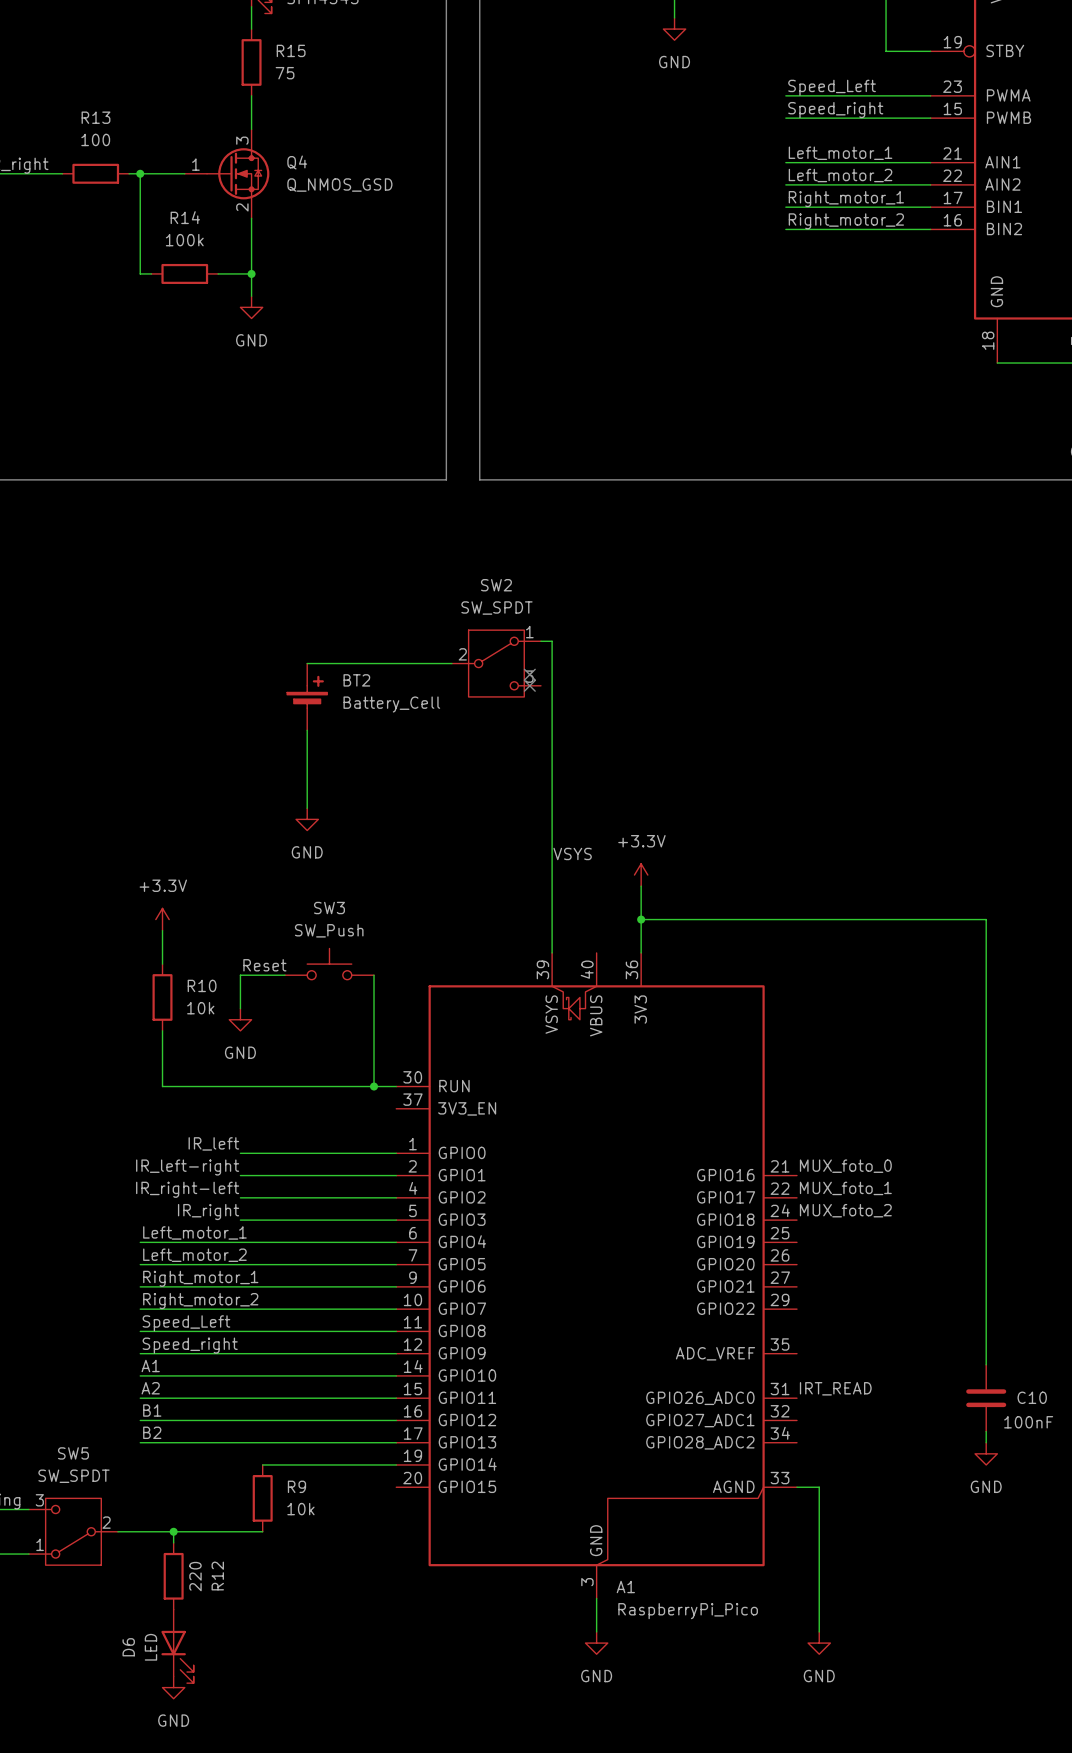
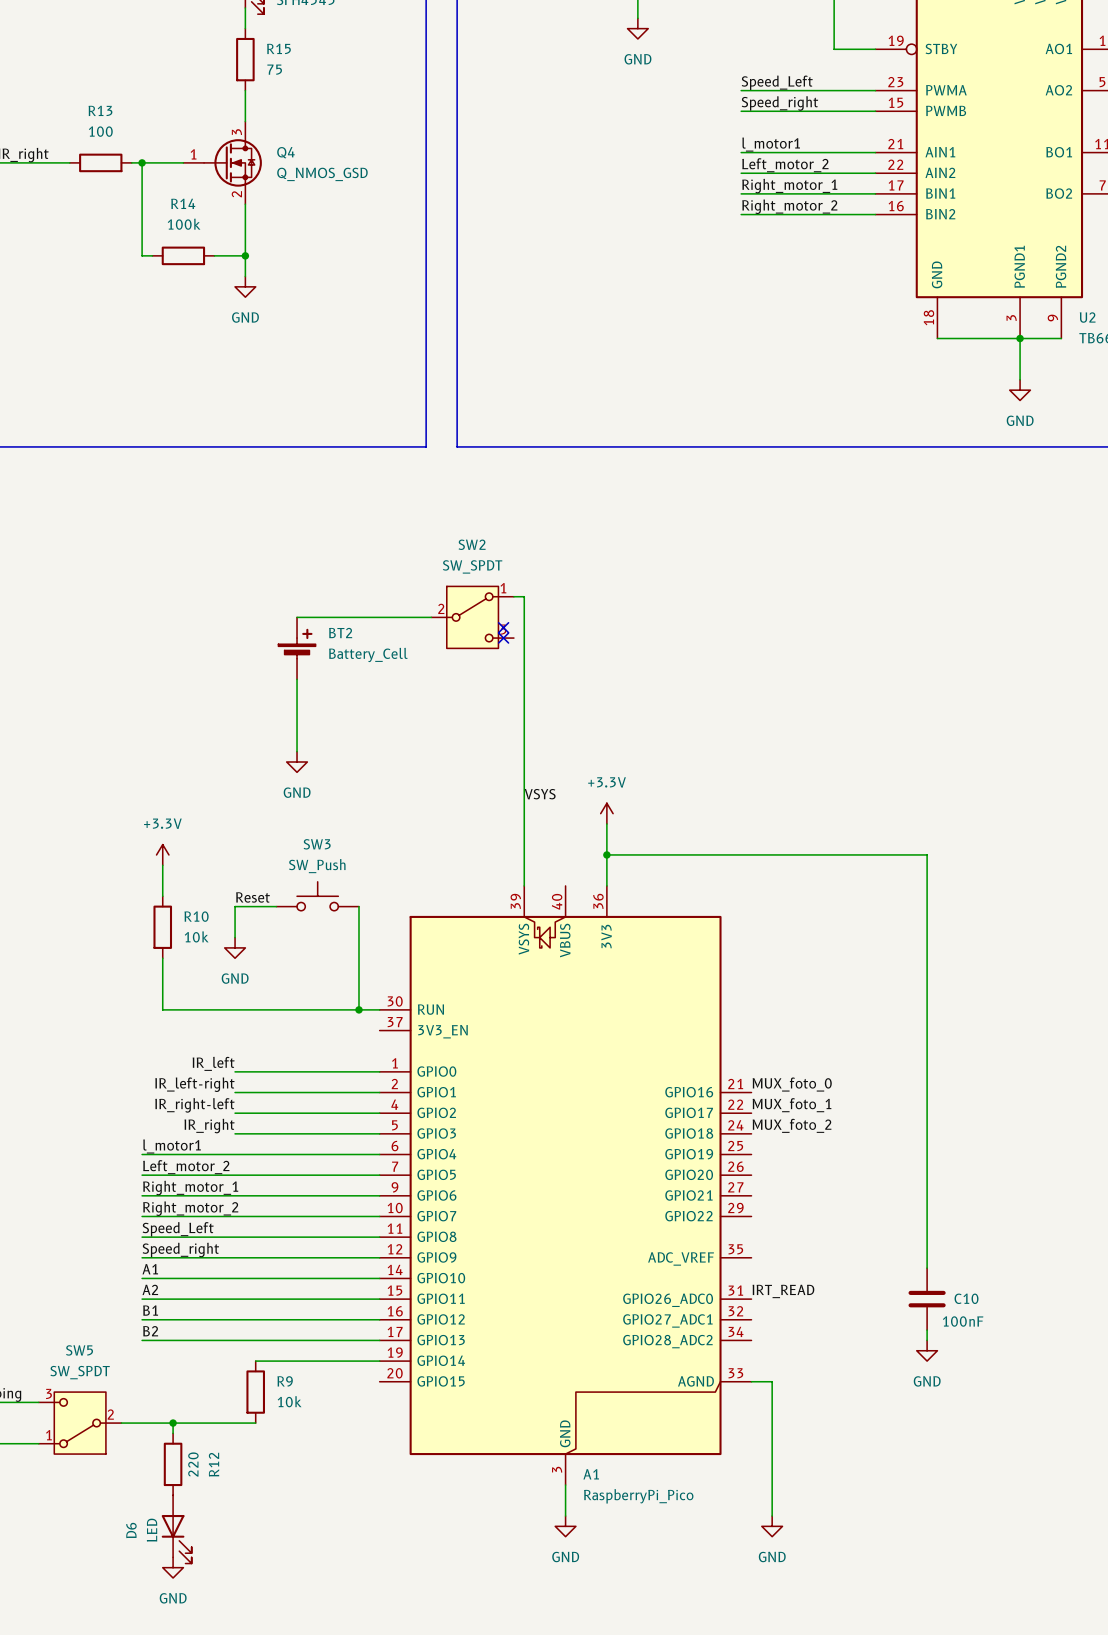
label: Left_motor_1 (840, 153) -> l_motor1 (771, 144)
label: Left_motor_1 (194, 1232) -> l_motor1 (172, 1146)

